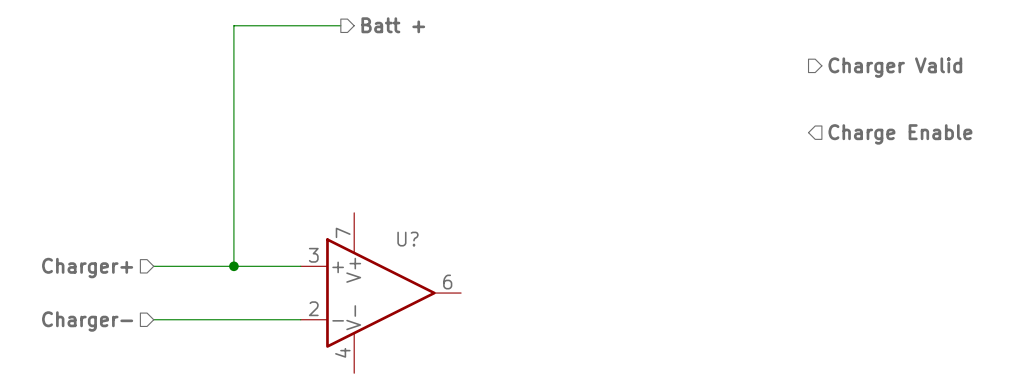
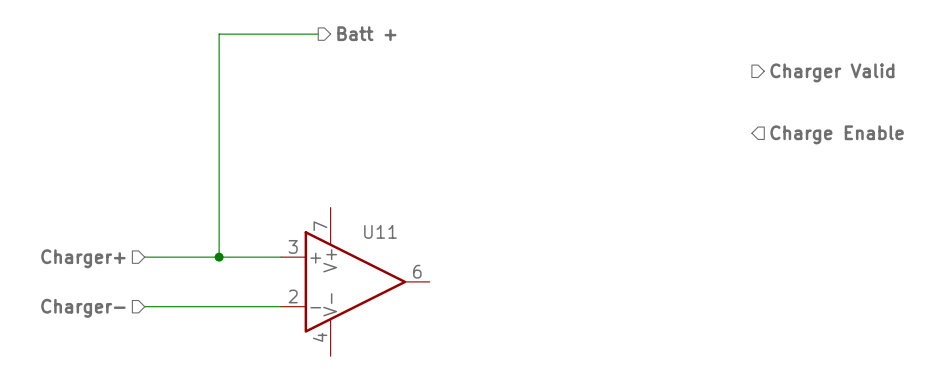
U? name: U? (407, 239) -> U11 (380, 231)

